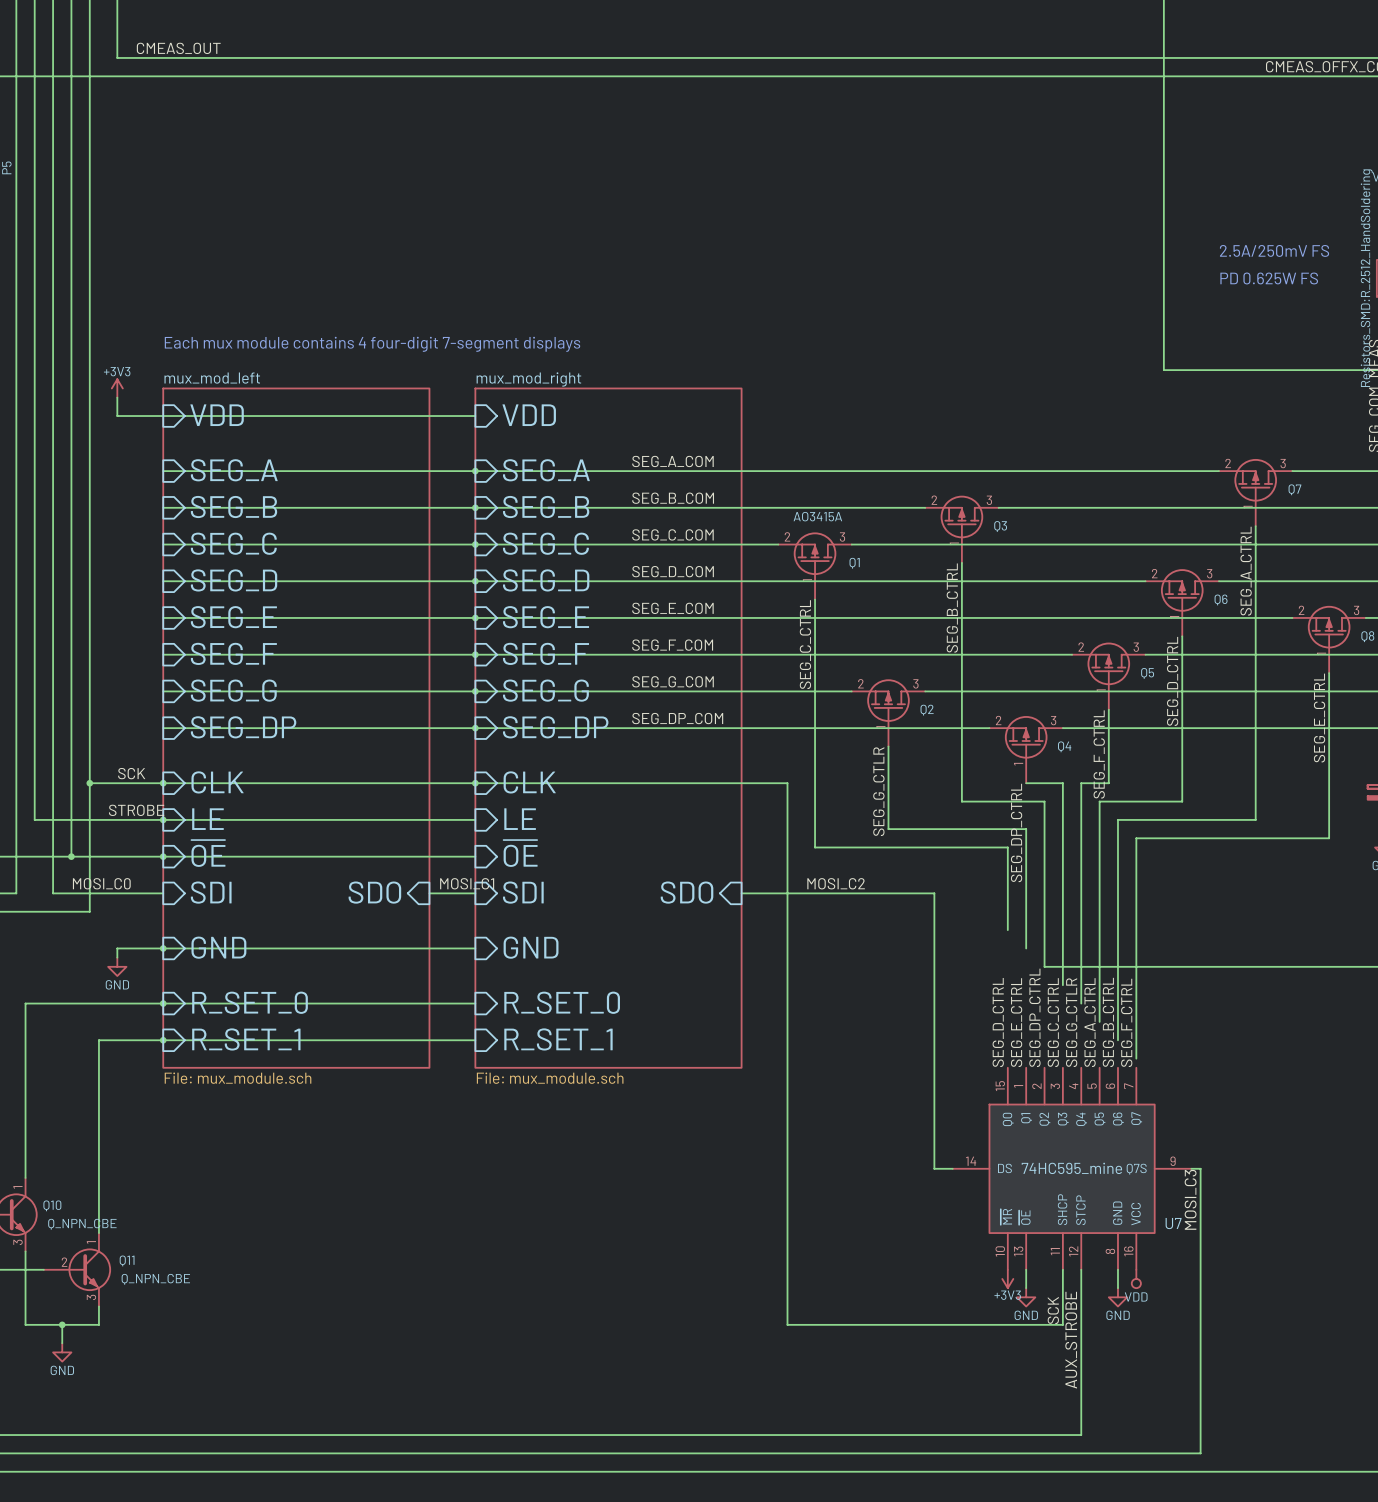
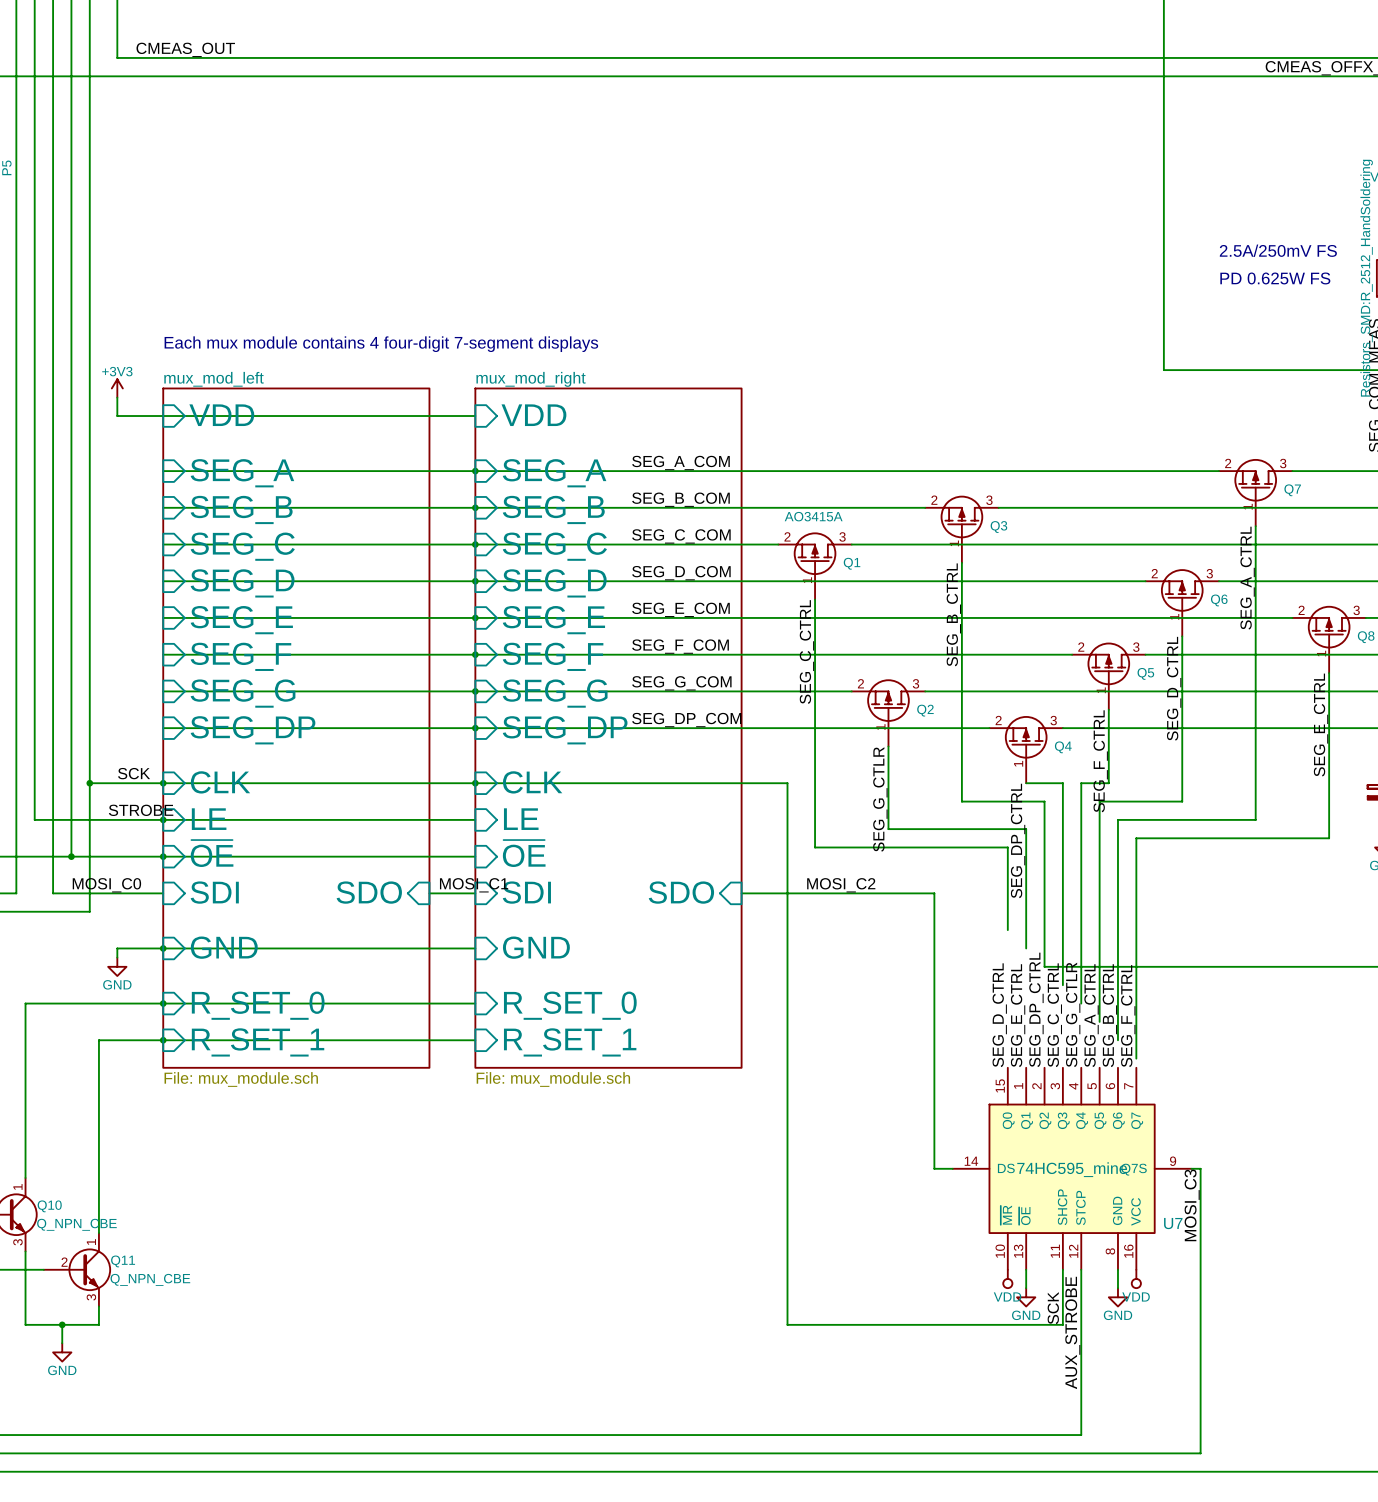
power symbol: +3V3 (1007, 1278) -> VDD (1007, 1278)

